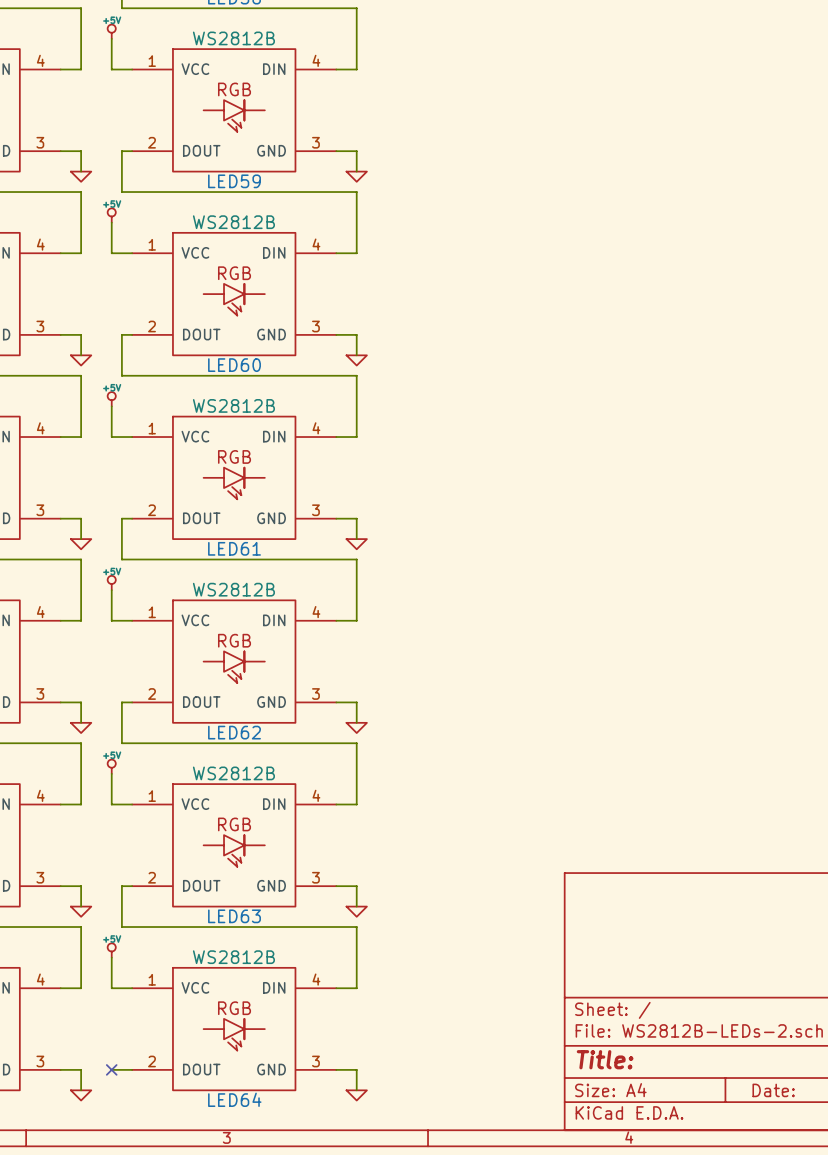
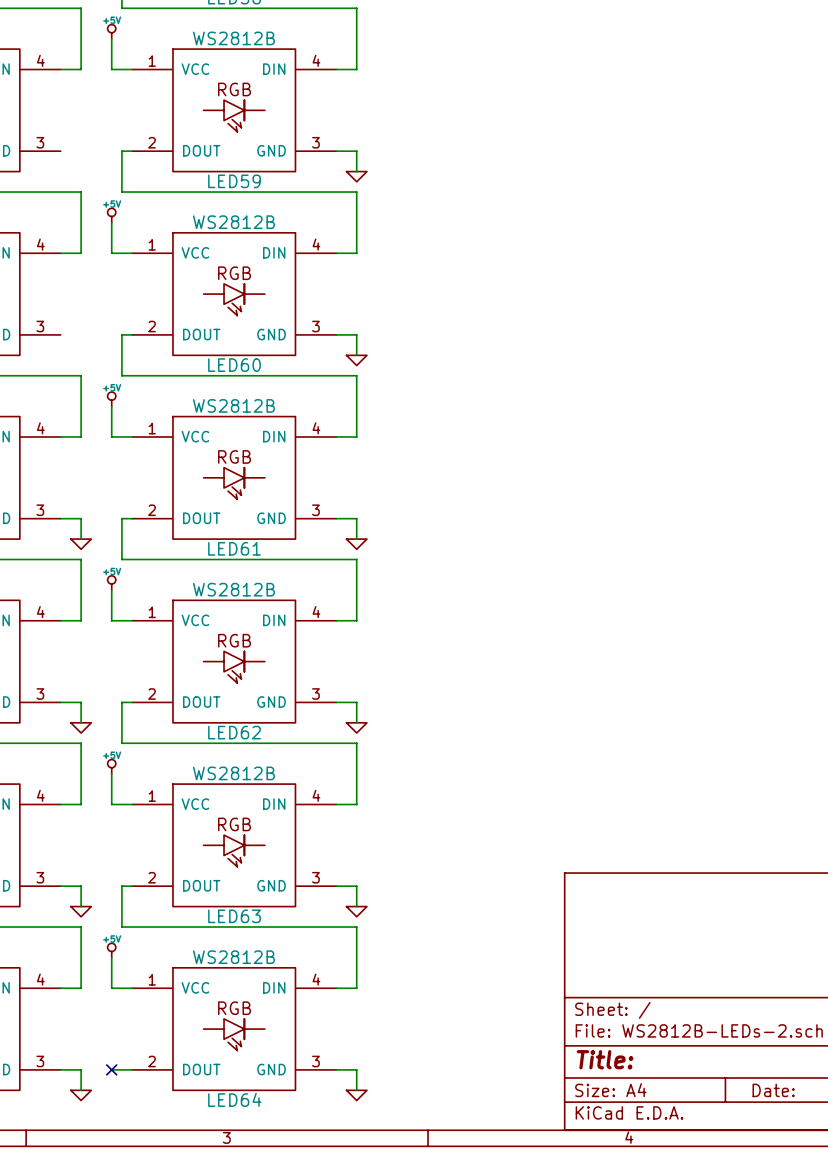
wire: (60, 151) (81, 151) (81, 171) -> none
power symbol: (81, 176) -> none
wire: (60, 334) (81, 334) (81, 355) -> none
power symbol: (81, 360) -> none

